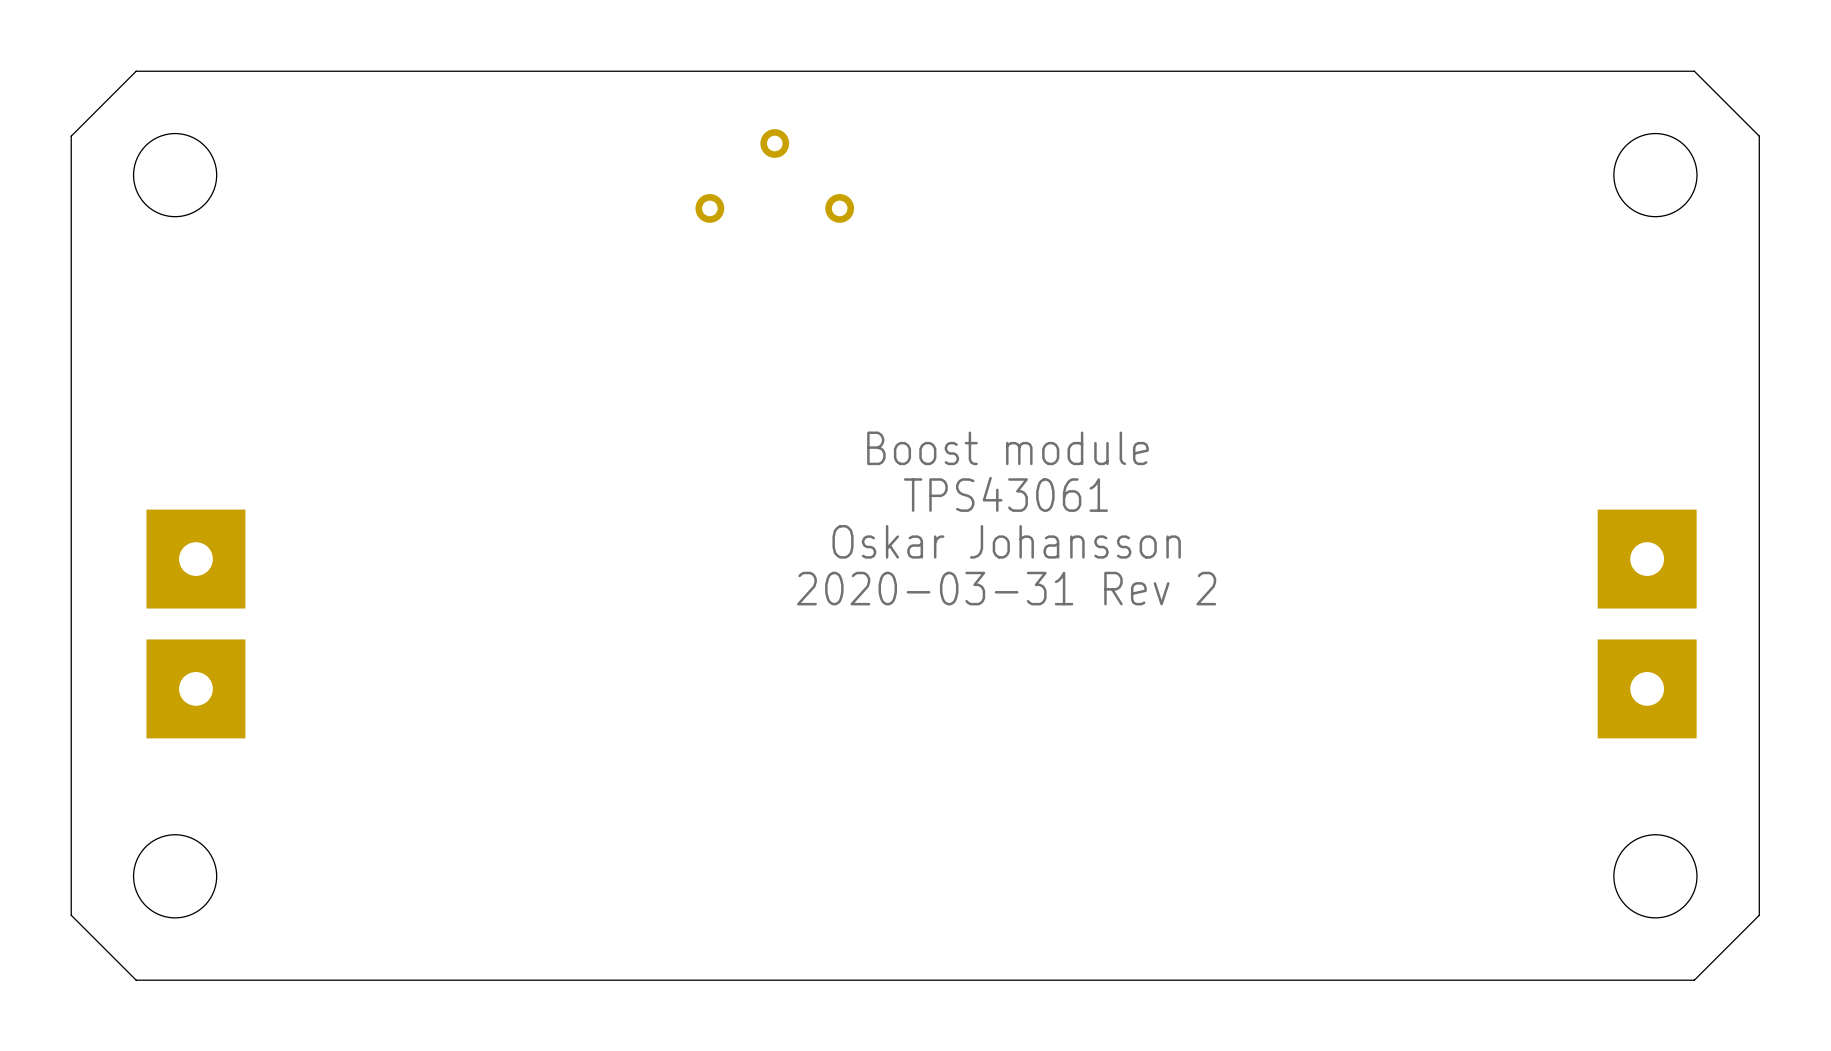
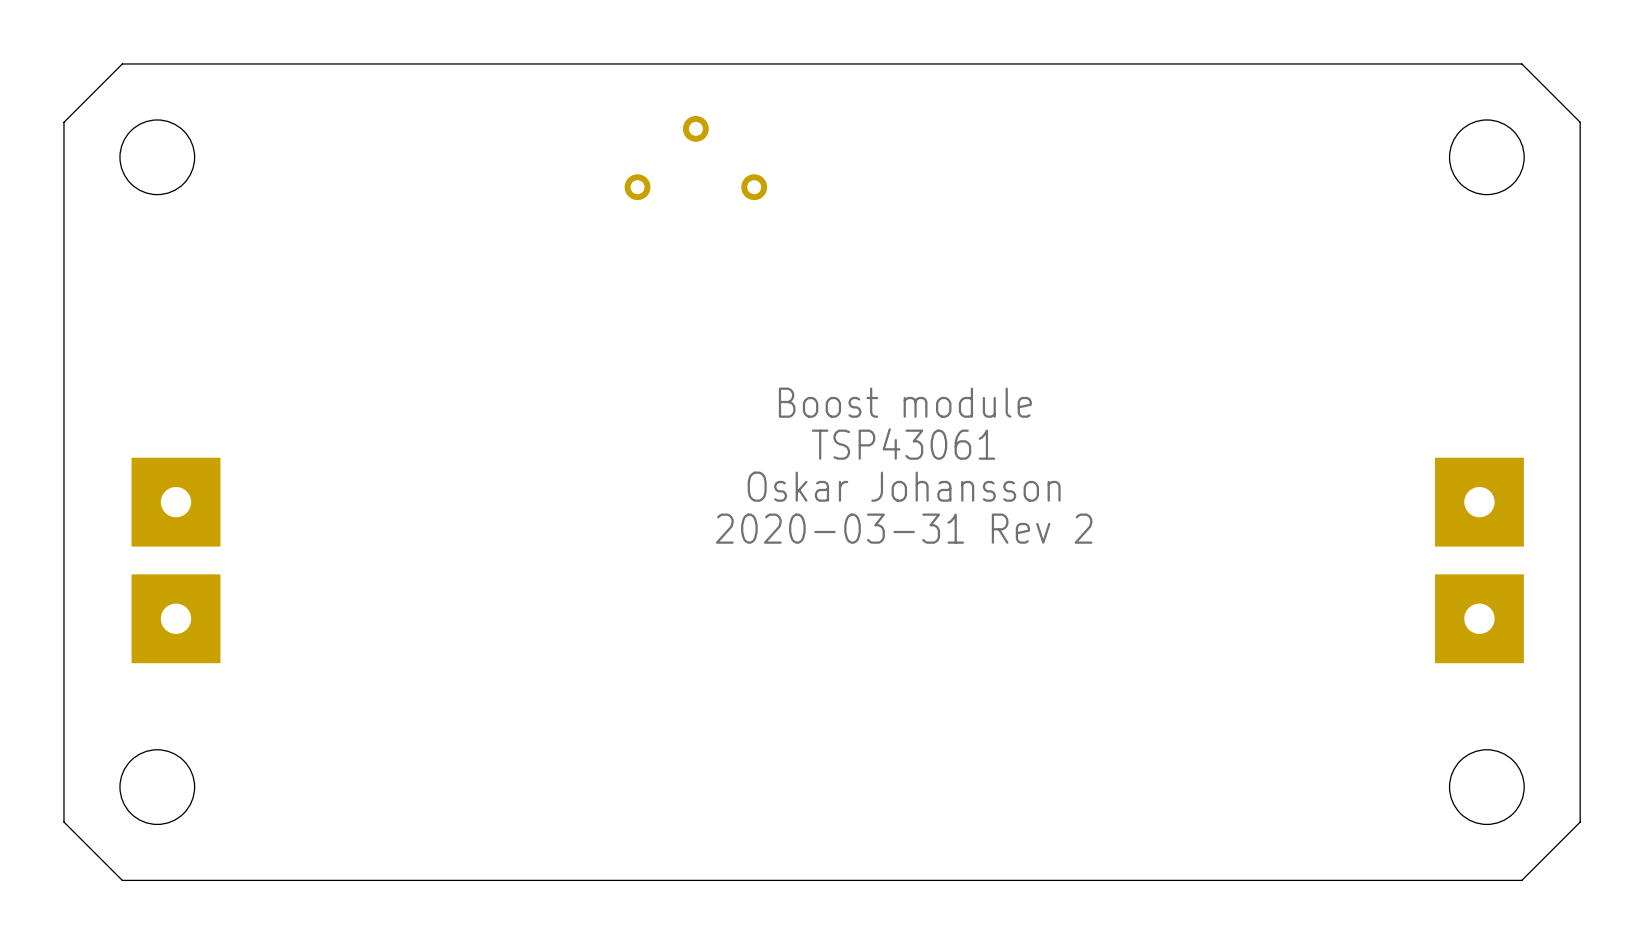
text: TPS43061 (1005, 494) -> TSP43061 (903, 444)

